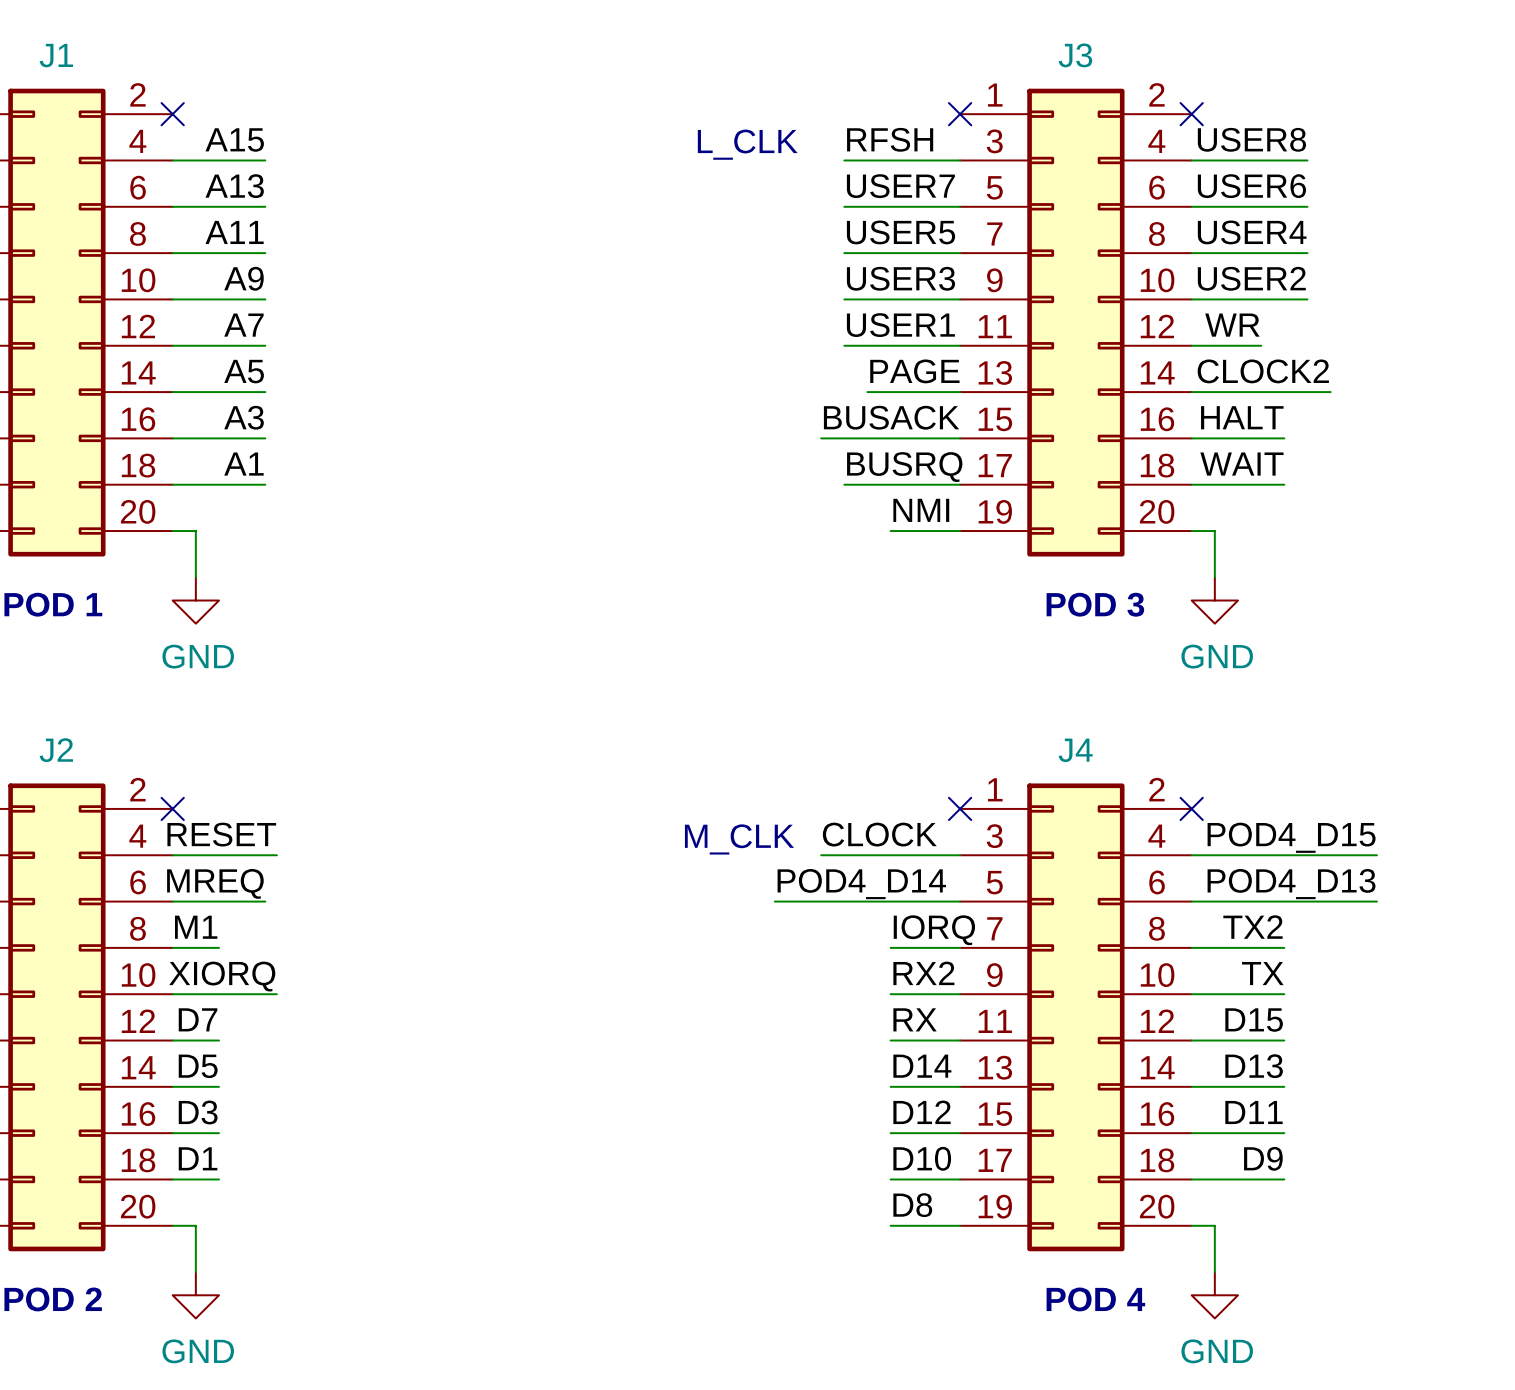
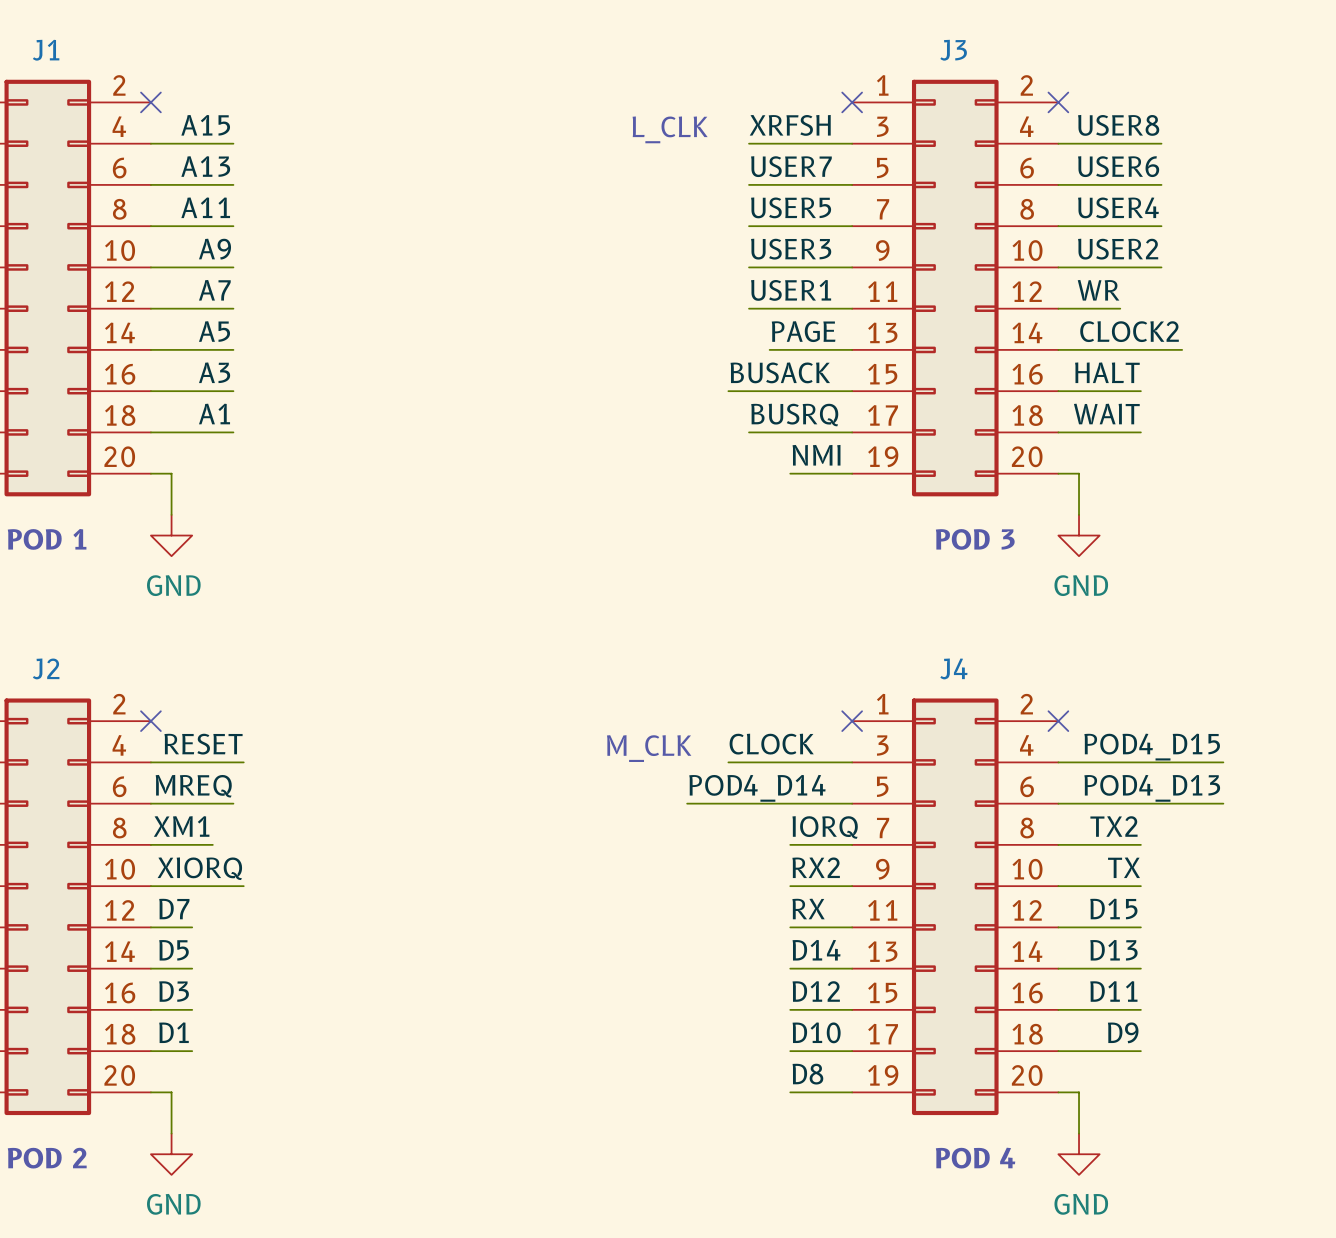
label: RFSH (890, 139) -> XRFSH (790, 125)
label: M1 (196, 927) -> XM1 (181, 826)
wire: none -> (192, 844) (212, 844)

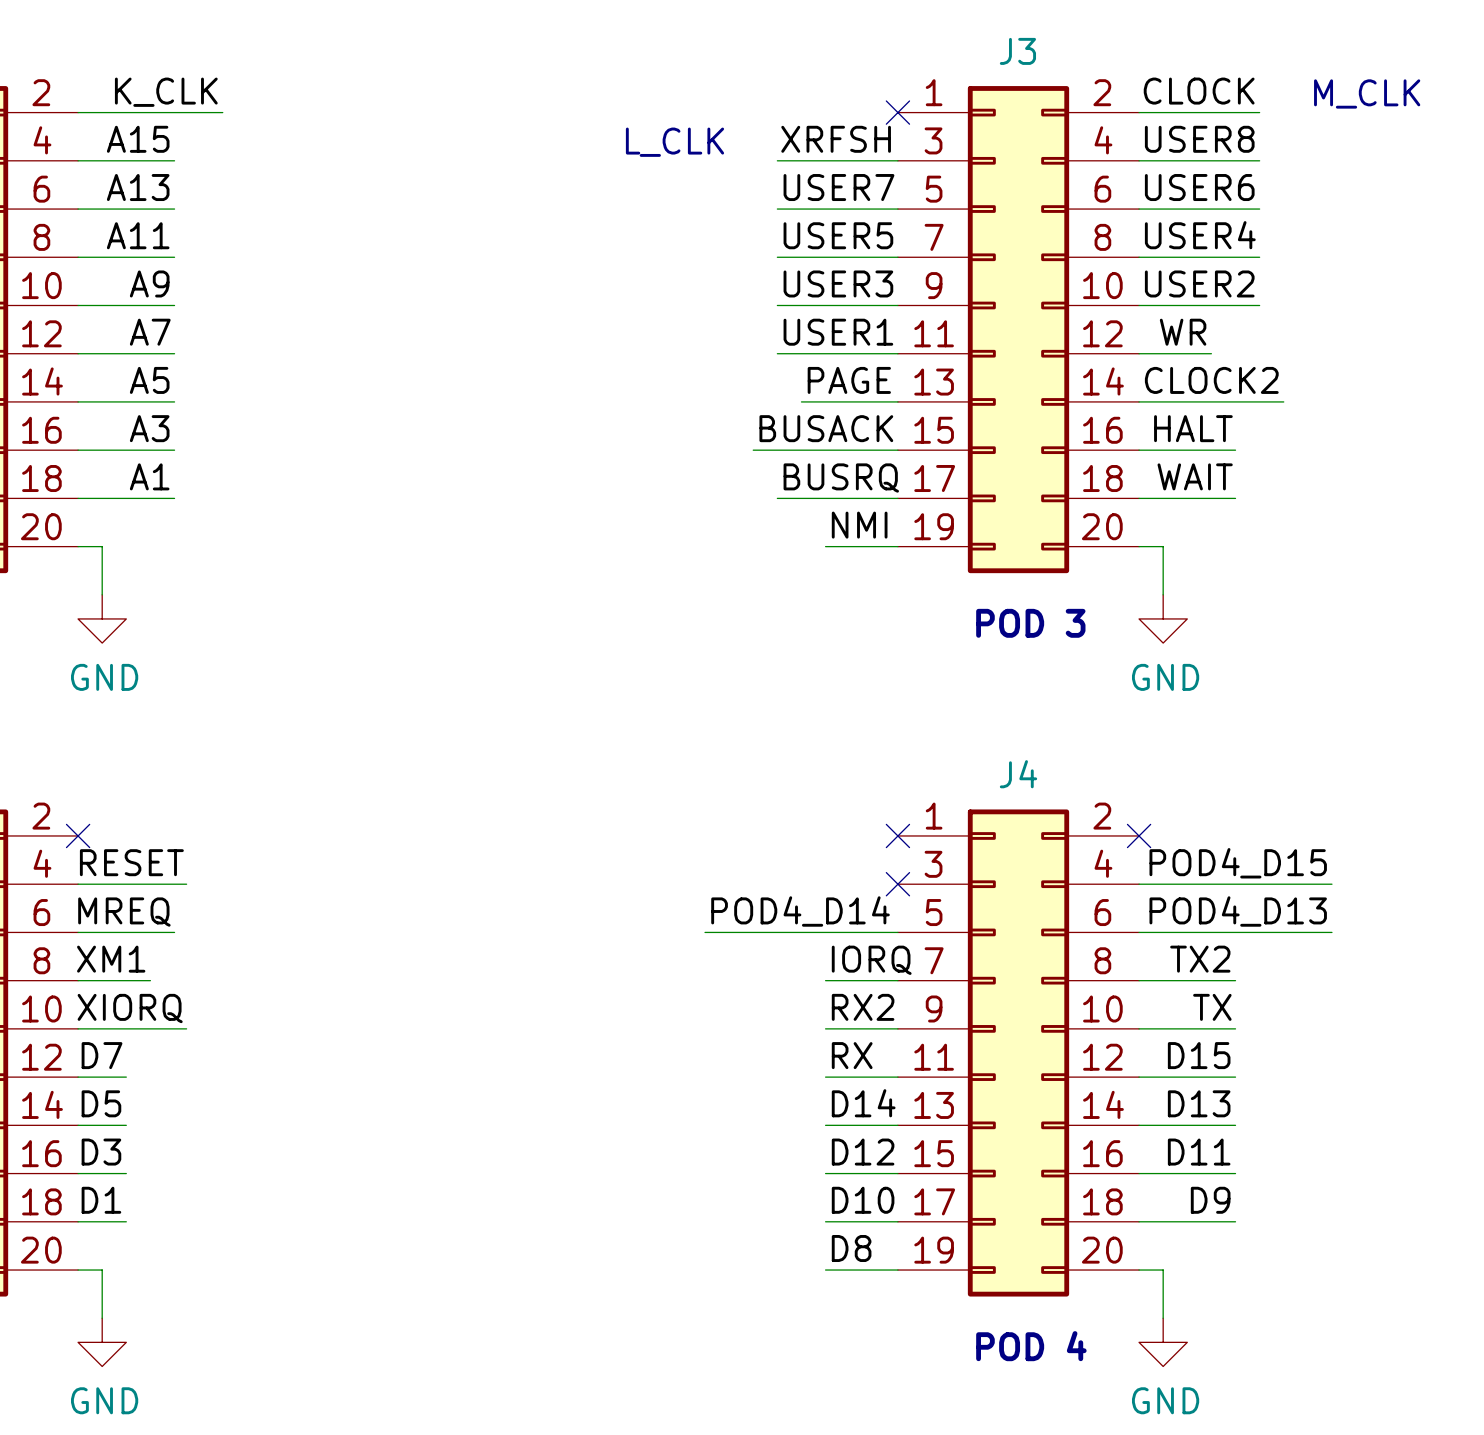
label: none -> CLOCK (1199, 91)
label: none -> K_CLK (166, 92)
text: none -> M_CLK (1367, 93)
wire: none -> (78, 112) (222, 112)
no-connect mark: (150, 102) -> none
wire: none -> (1139, 112) (1259, 112)
no-connect mark: (1058, 102) -> none
label: CLOCK (771, 744) -> none
text: M_CLK (649, 748) -> none
wire: (728, 762) (852, 762) -> none
no-connect mark: none -> (897, 884)

